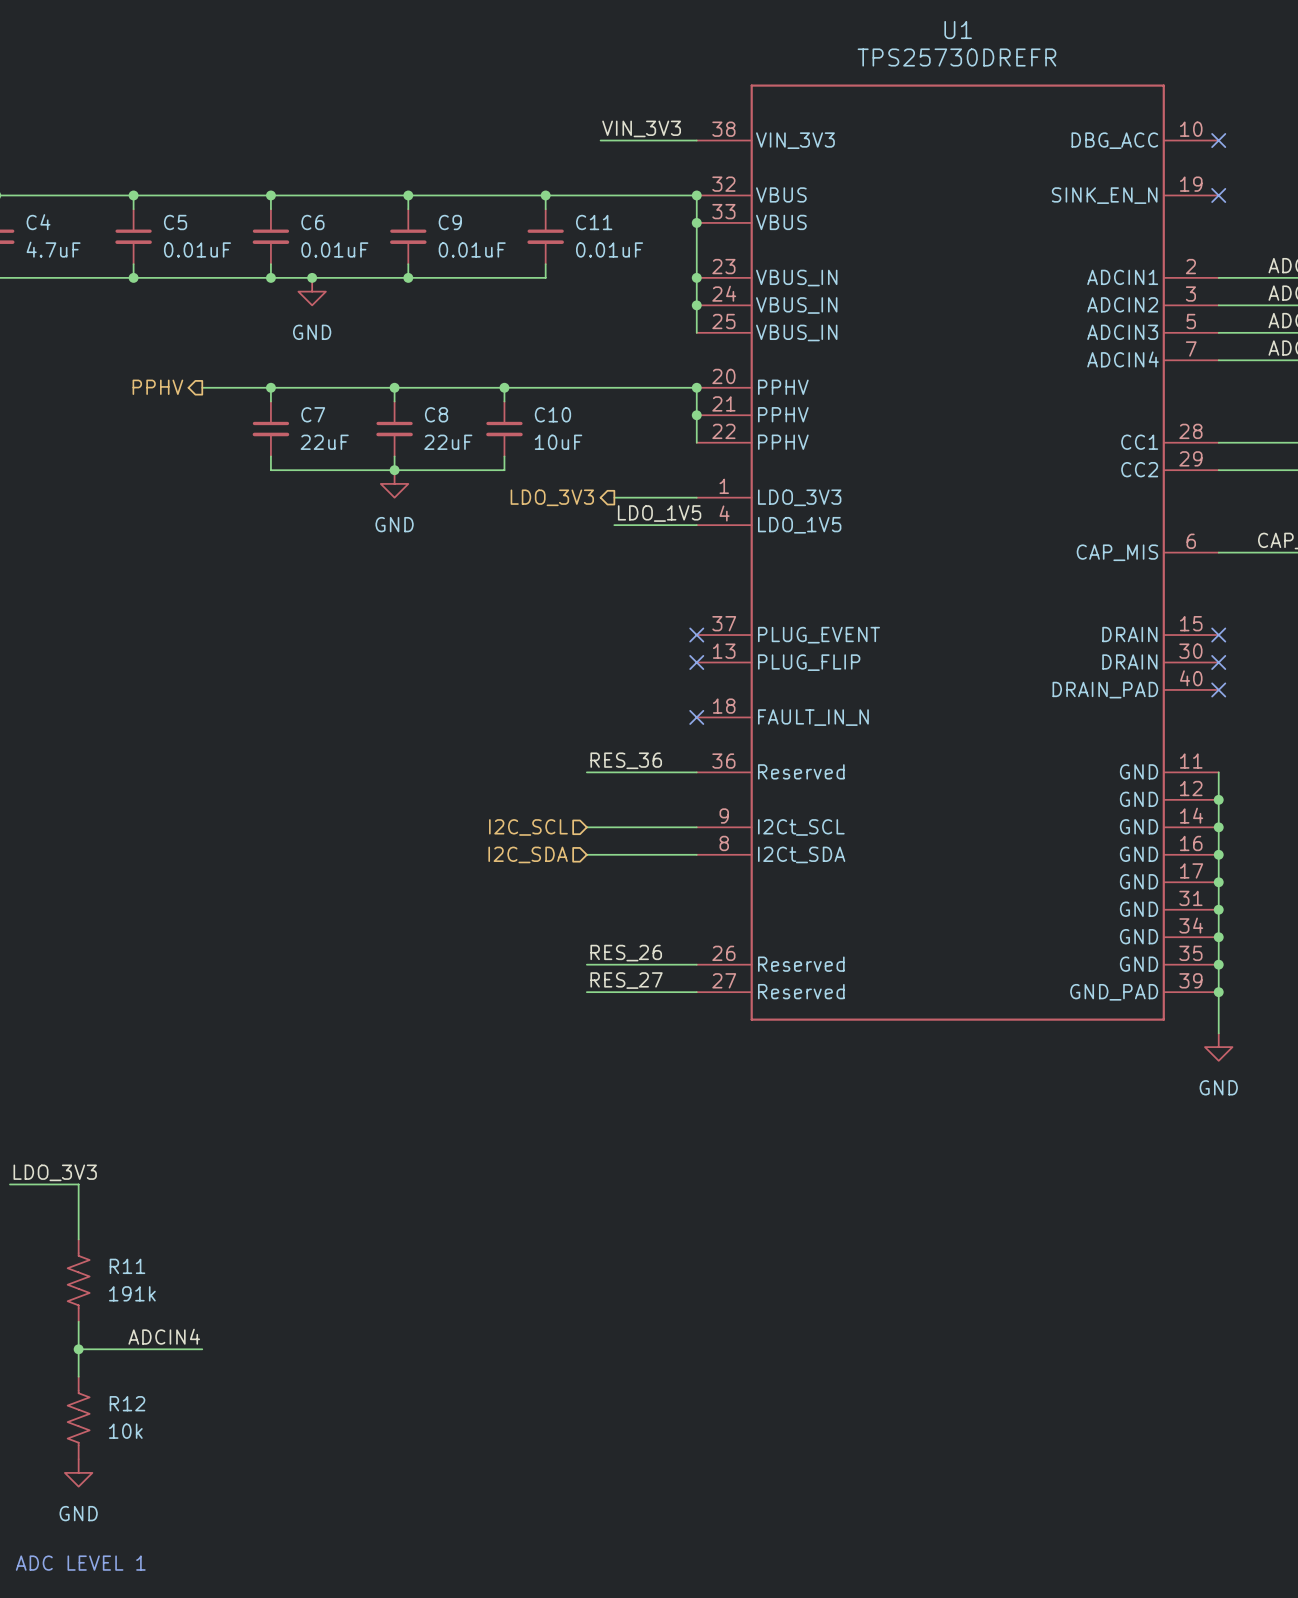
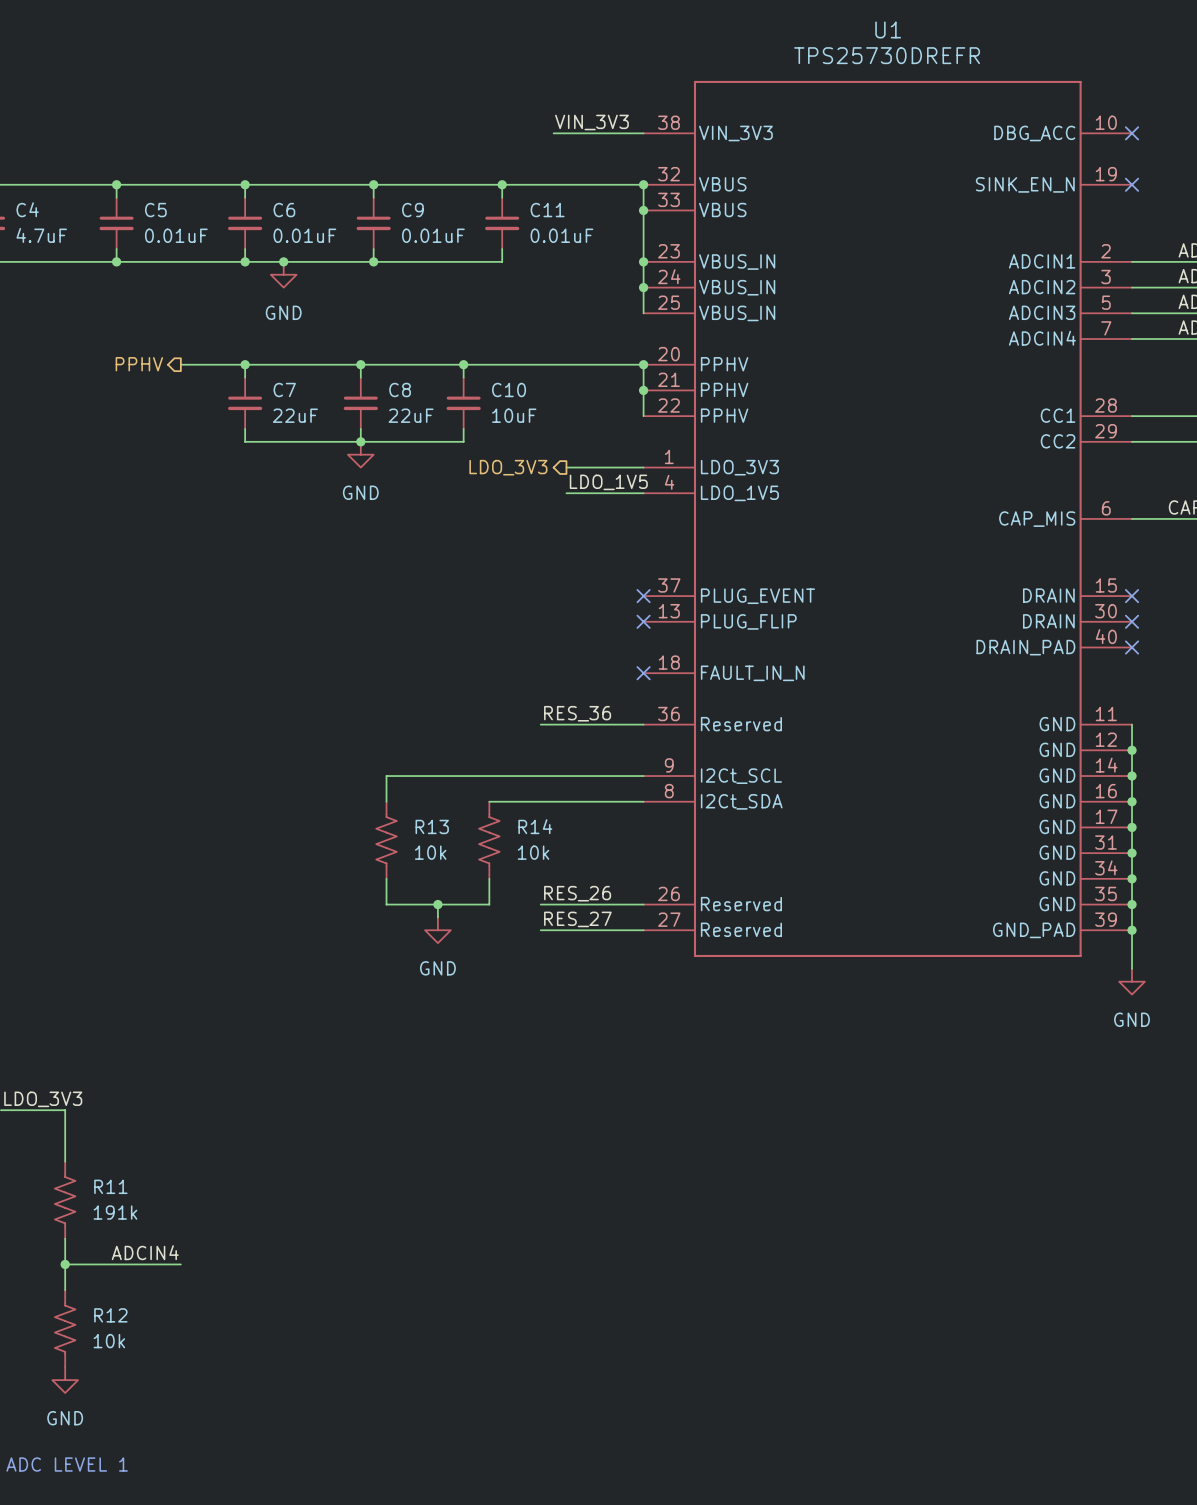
hierarchical label: I2C_SCL (528, 827) -> none
wire: none -> (540, 776) (386, 776) (386, 801)
hierarchical label: I2C_SDA (528, 854) -> none
wire: none -> (489, 801) (540, 801)
R13: none -> 10k (386, 840)
R14: none -> 10k (489, 840)
wire: none -> (386, 878) (386, 904) (489, 904) (489, 878)
wire: none -> (437, 904) (437, 917)
junction: none -> (437, 904)
power symbol: none -> GND (437, 930)

